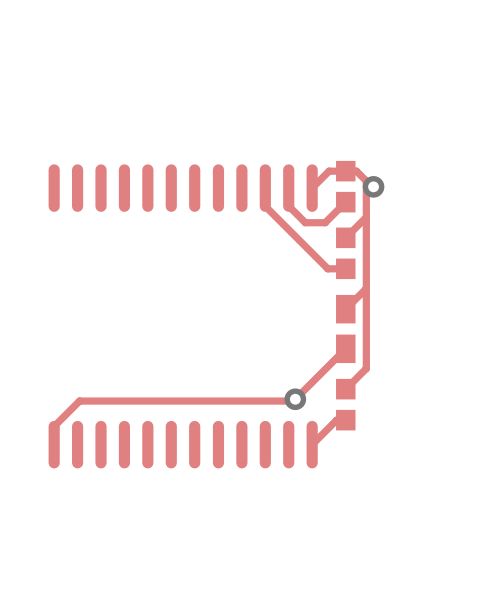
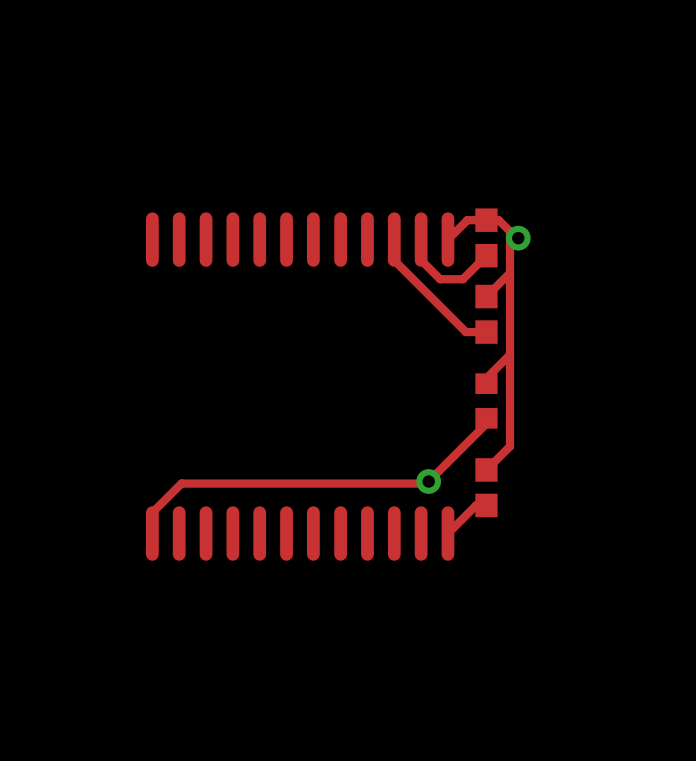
part footprint: [336, 294, 356, 364] -> [475, 373, 498, 429]

